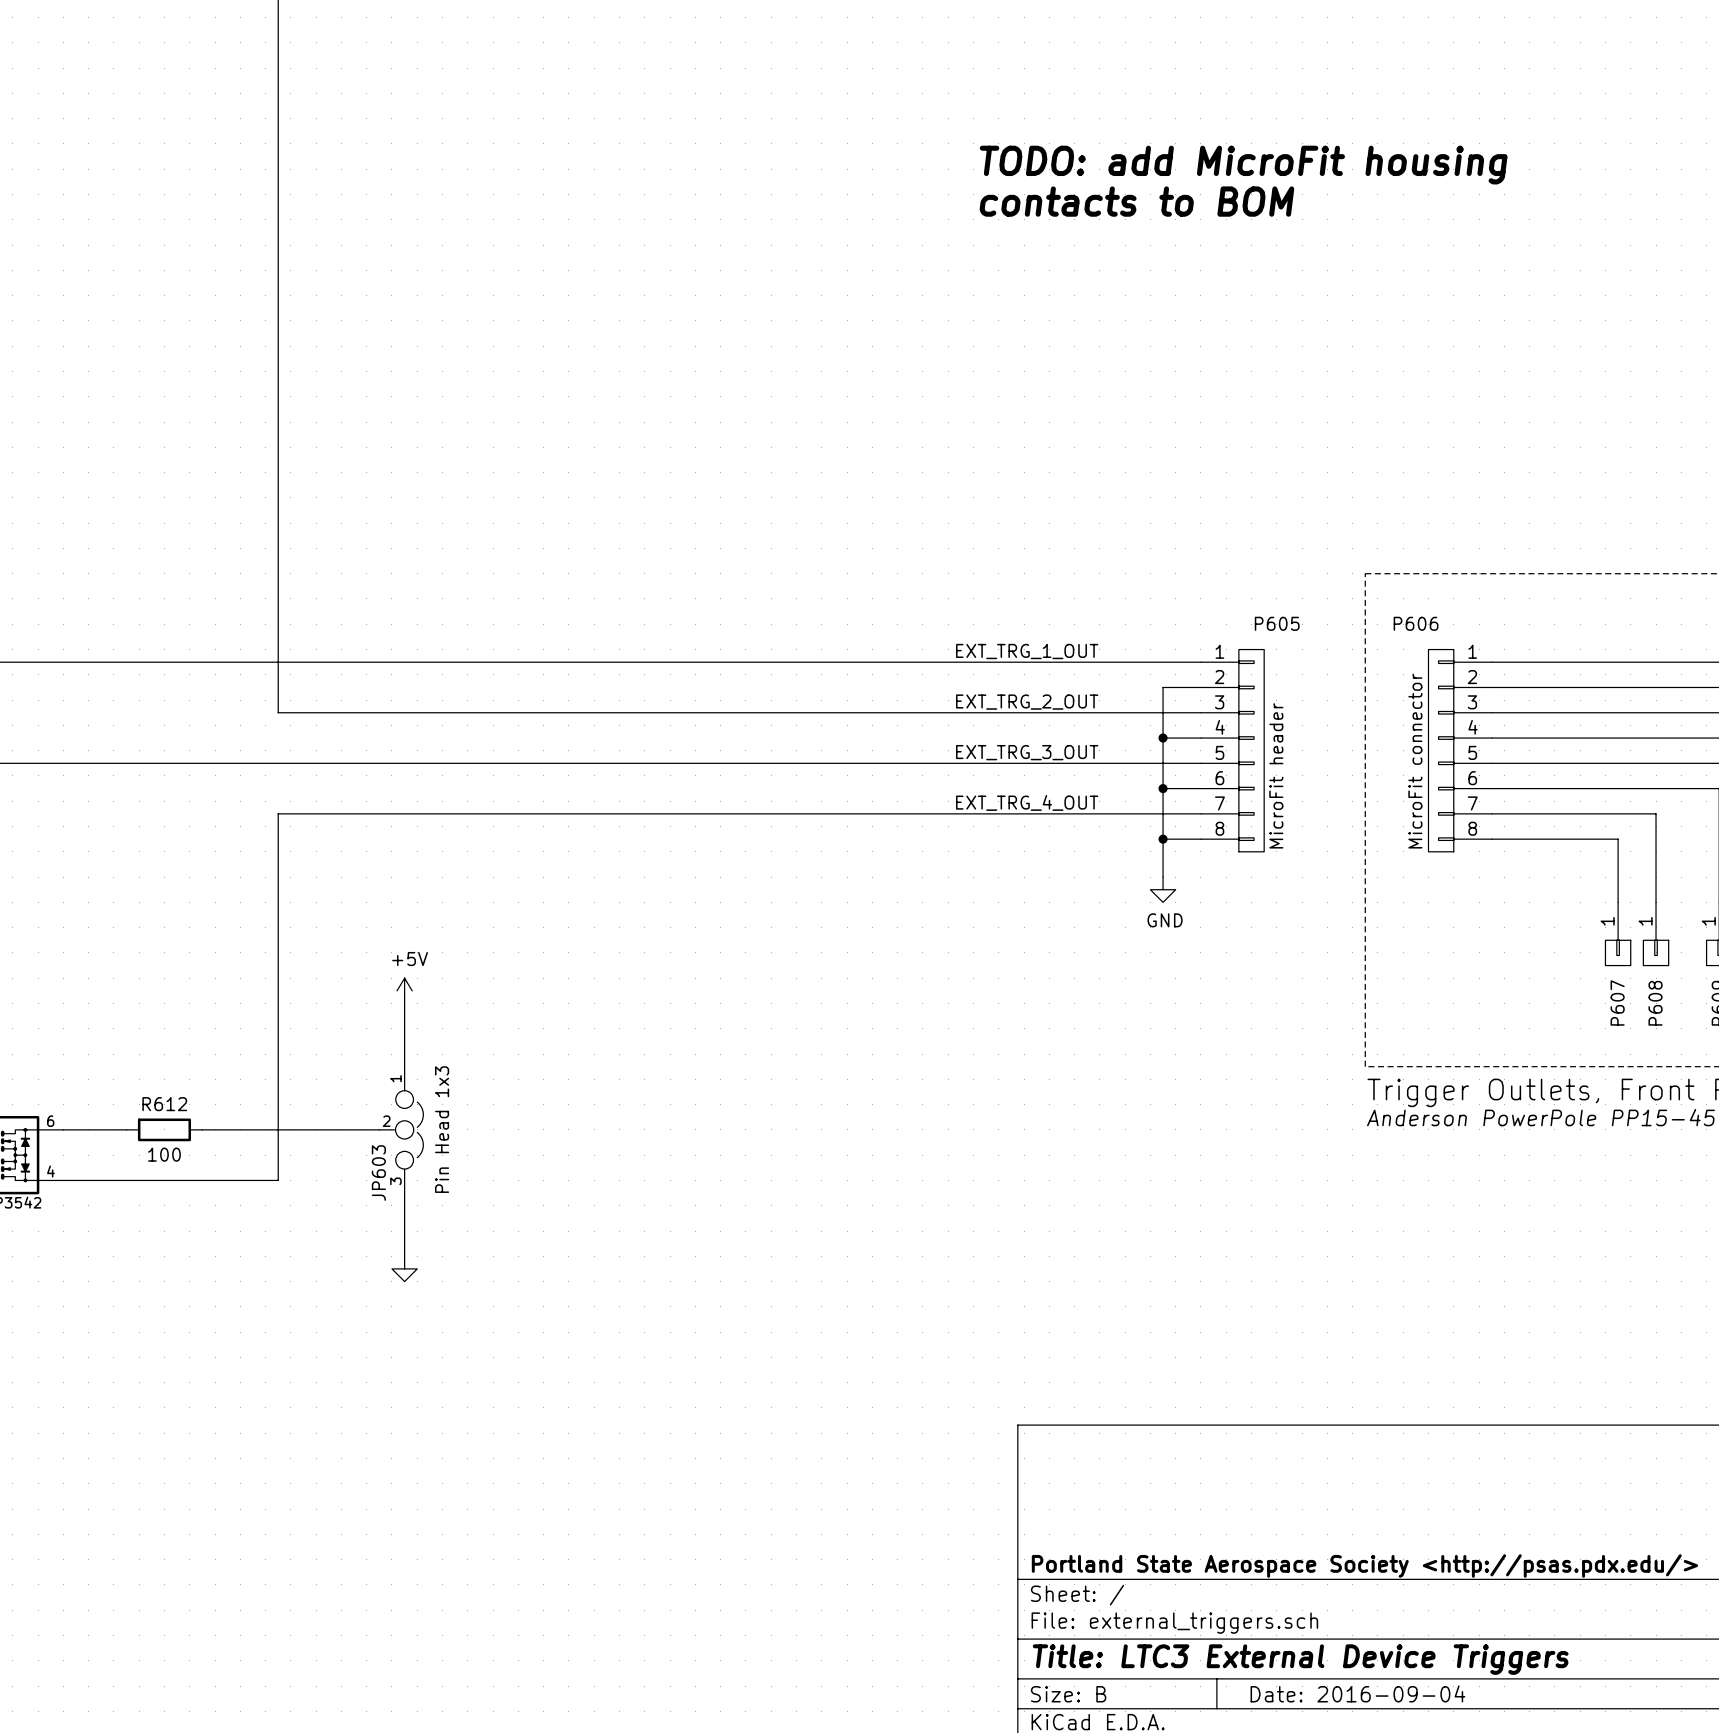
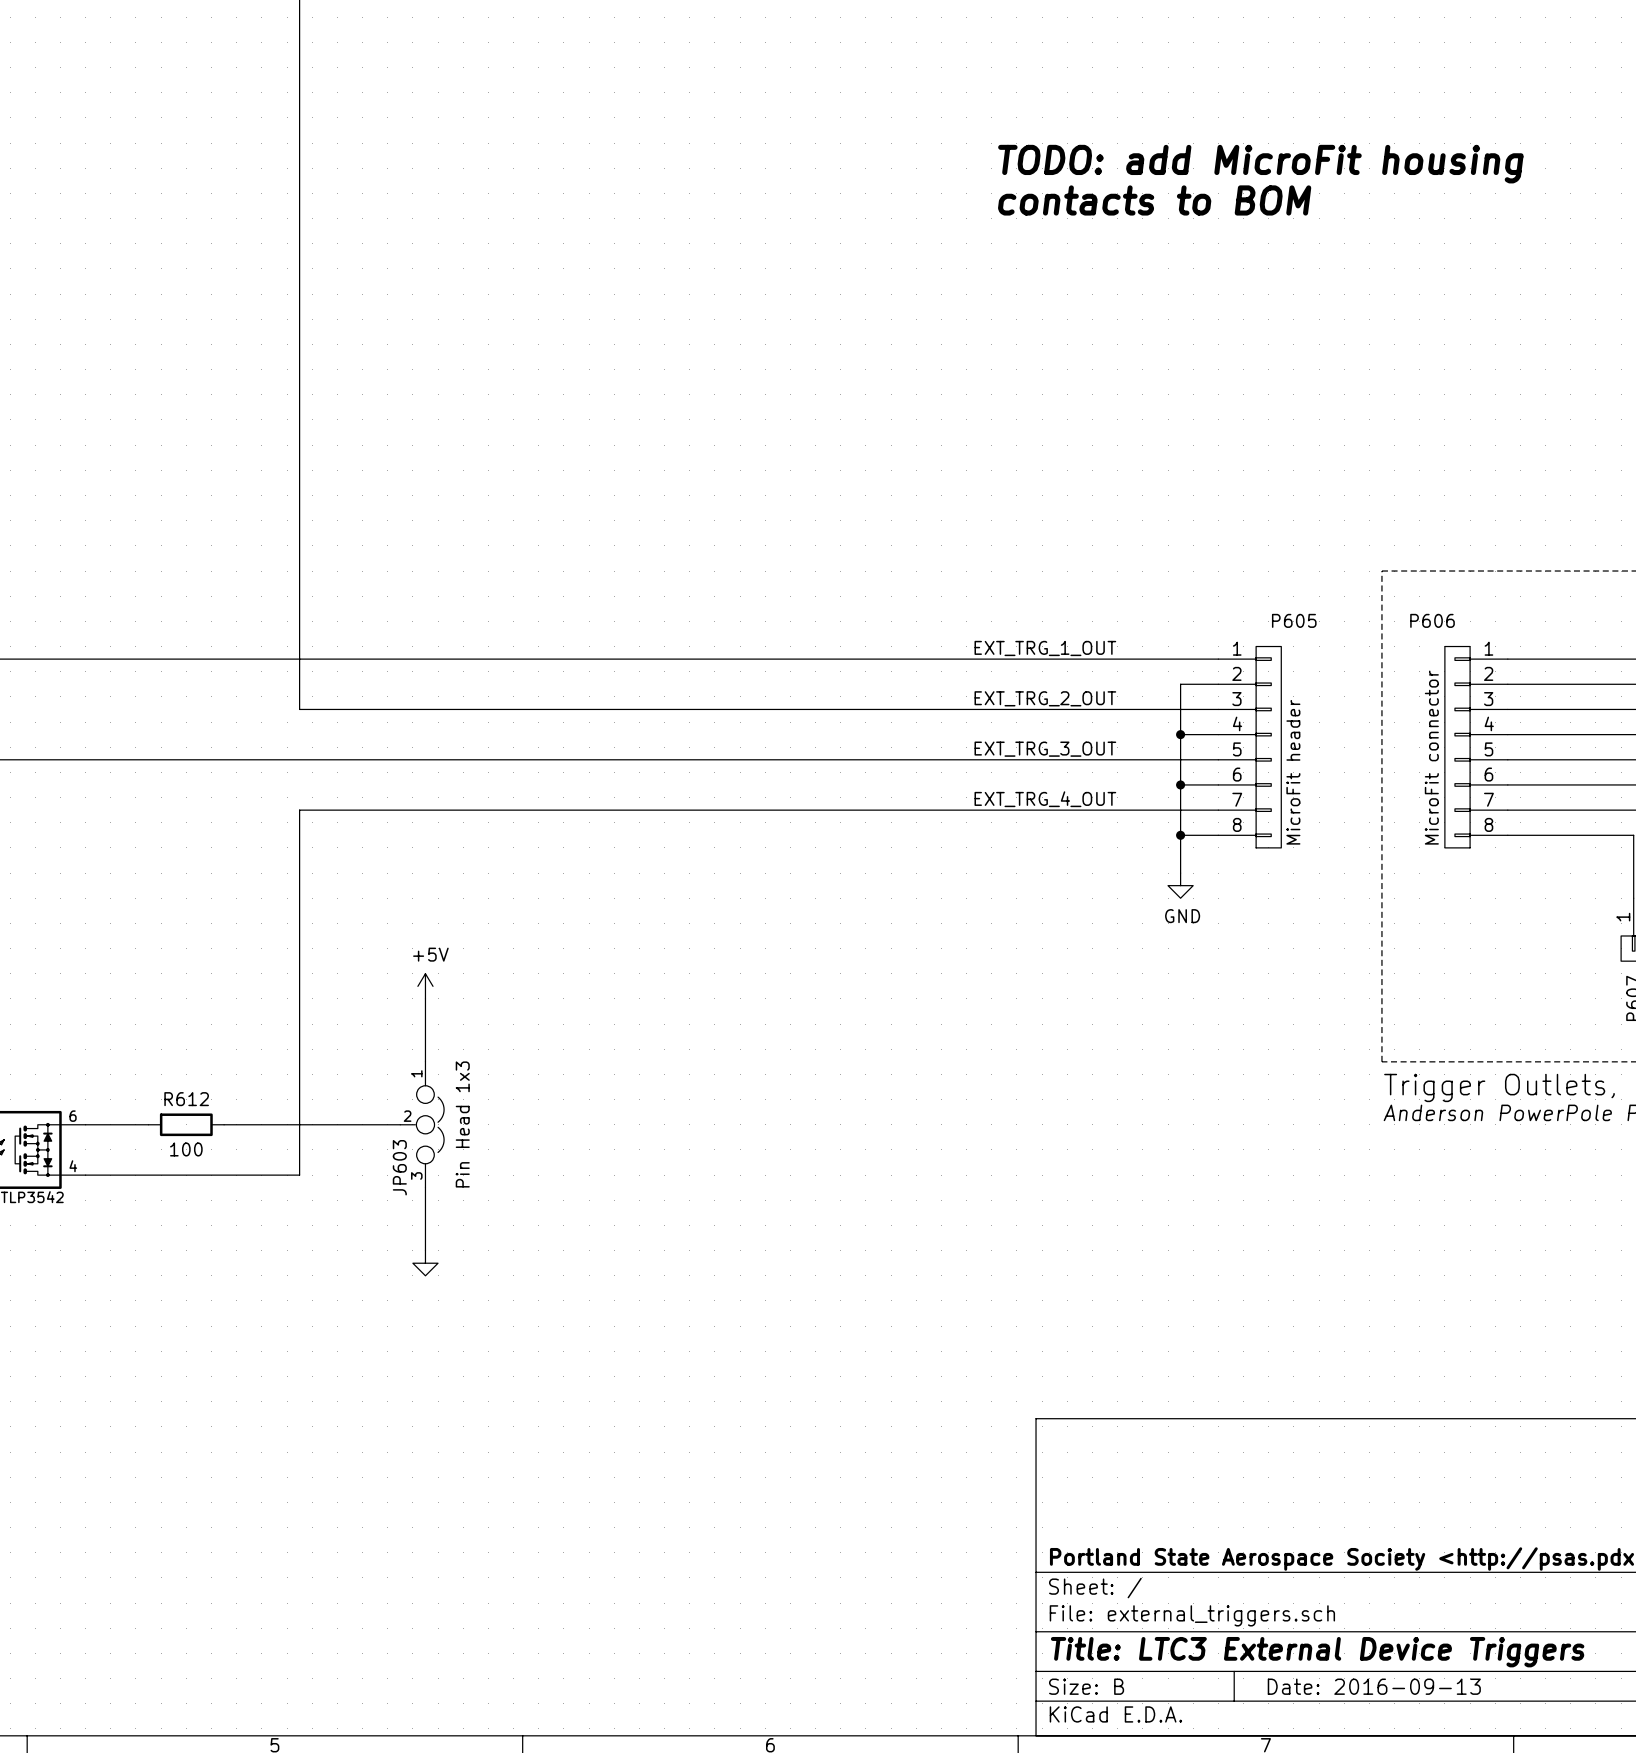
title block: Date: 2016-09-04 (1357, 1693) -> Date: 2016-09-13 (1374, 1686)

